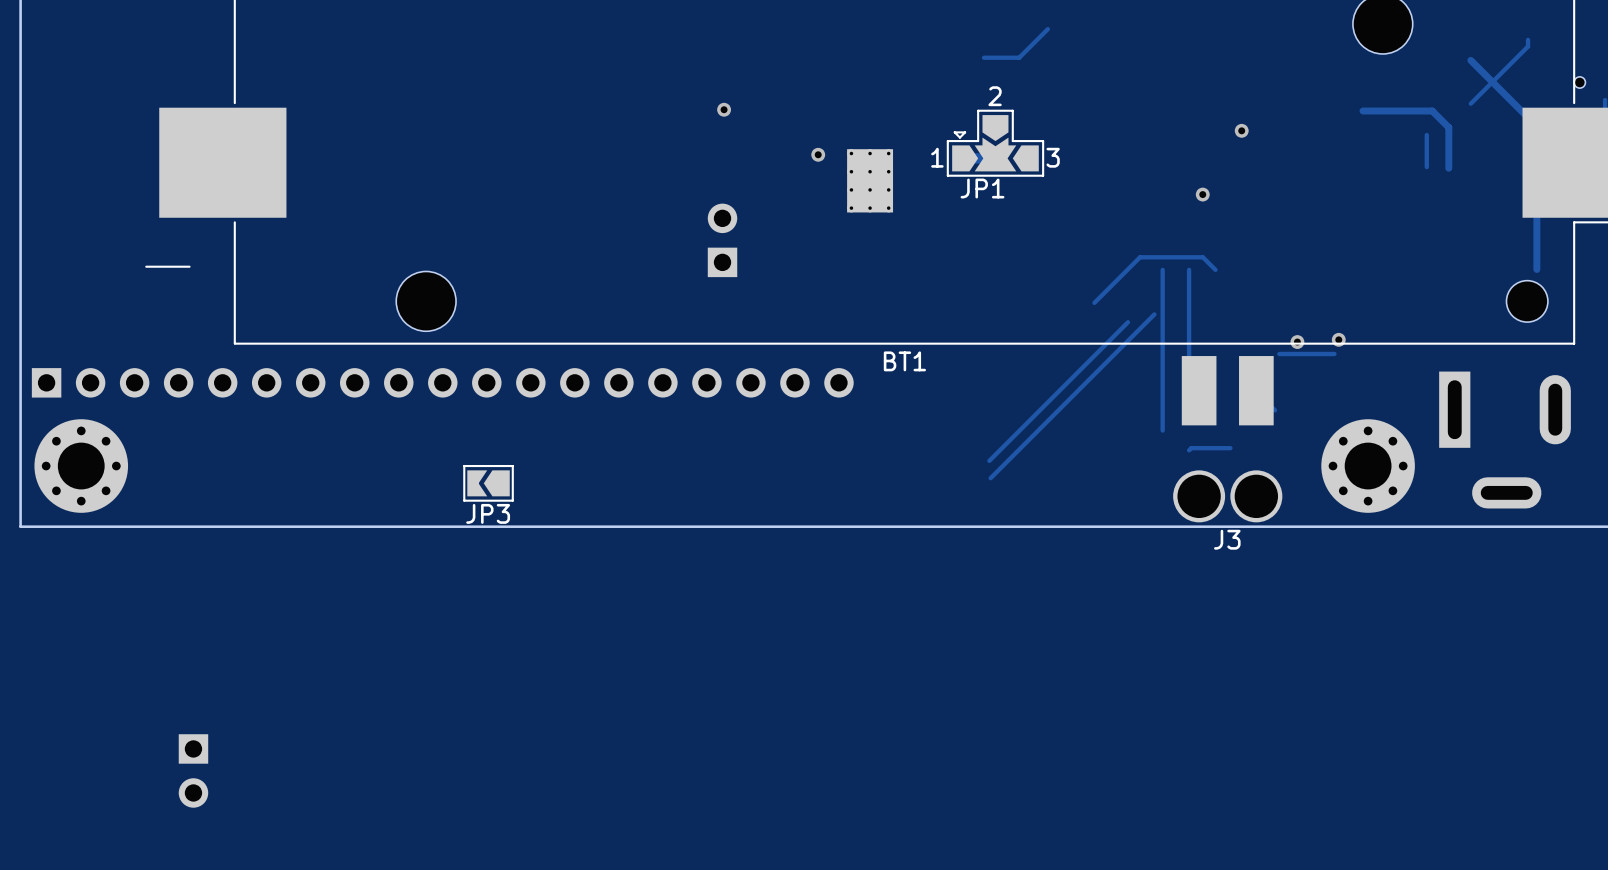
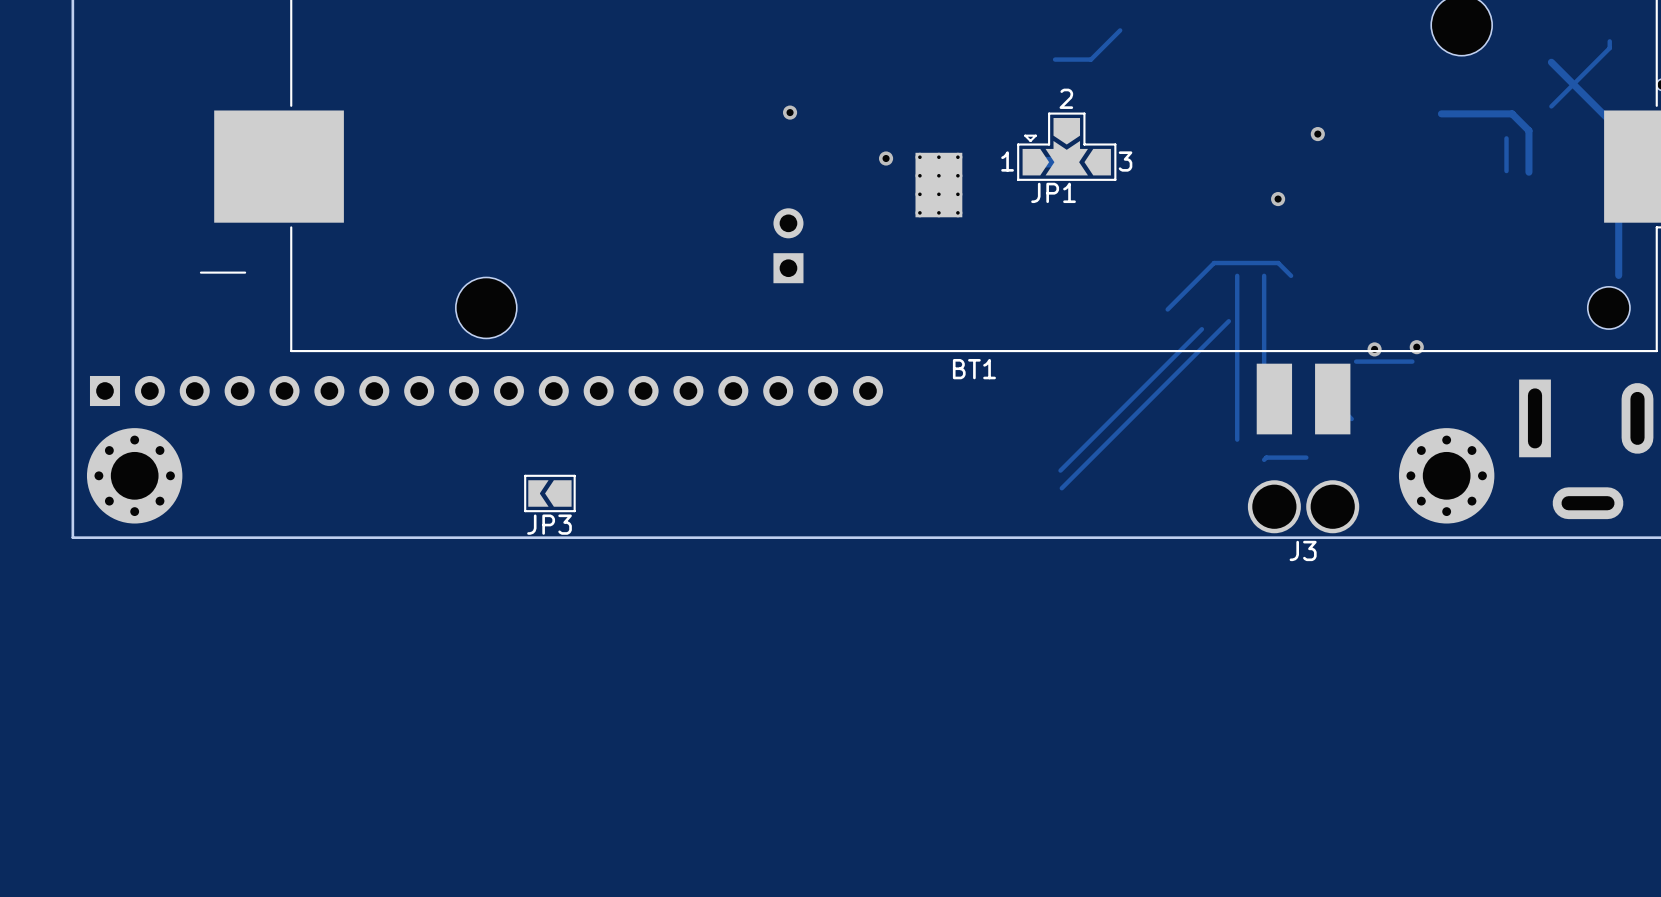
part footprint: [31, 368, 854, 398] -> [89, 375, 884, 407]
part: (193, 770) -> none

